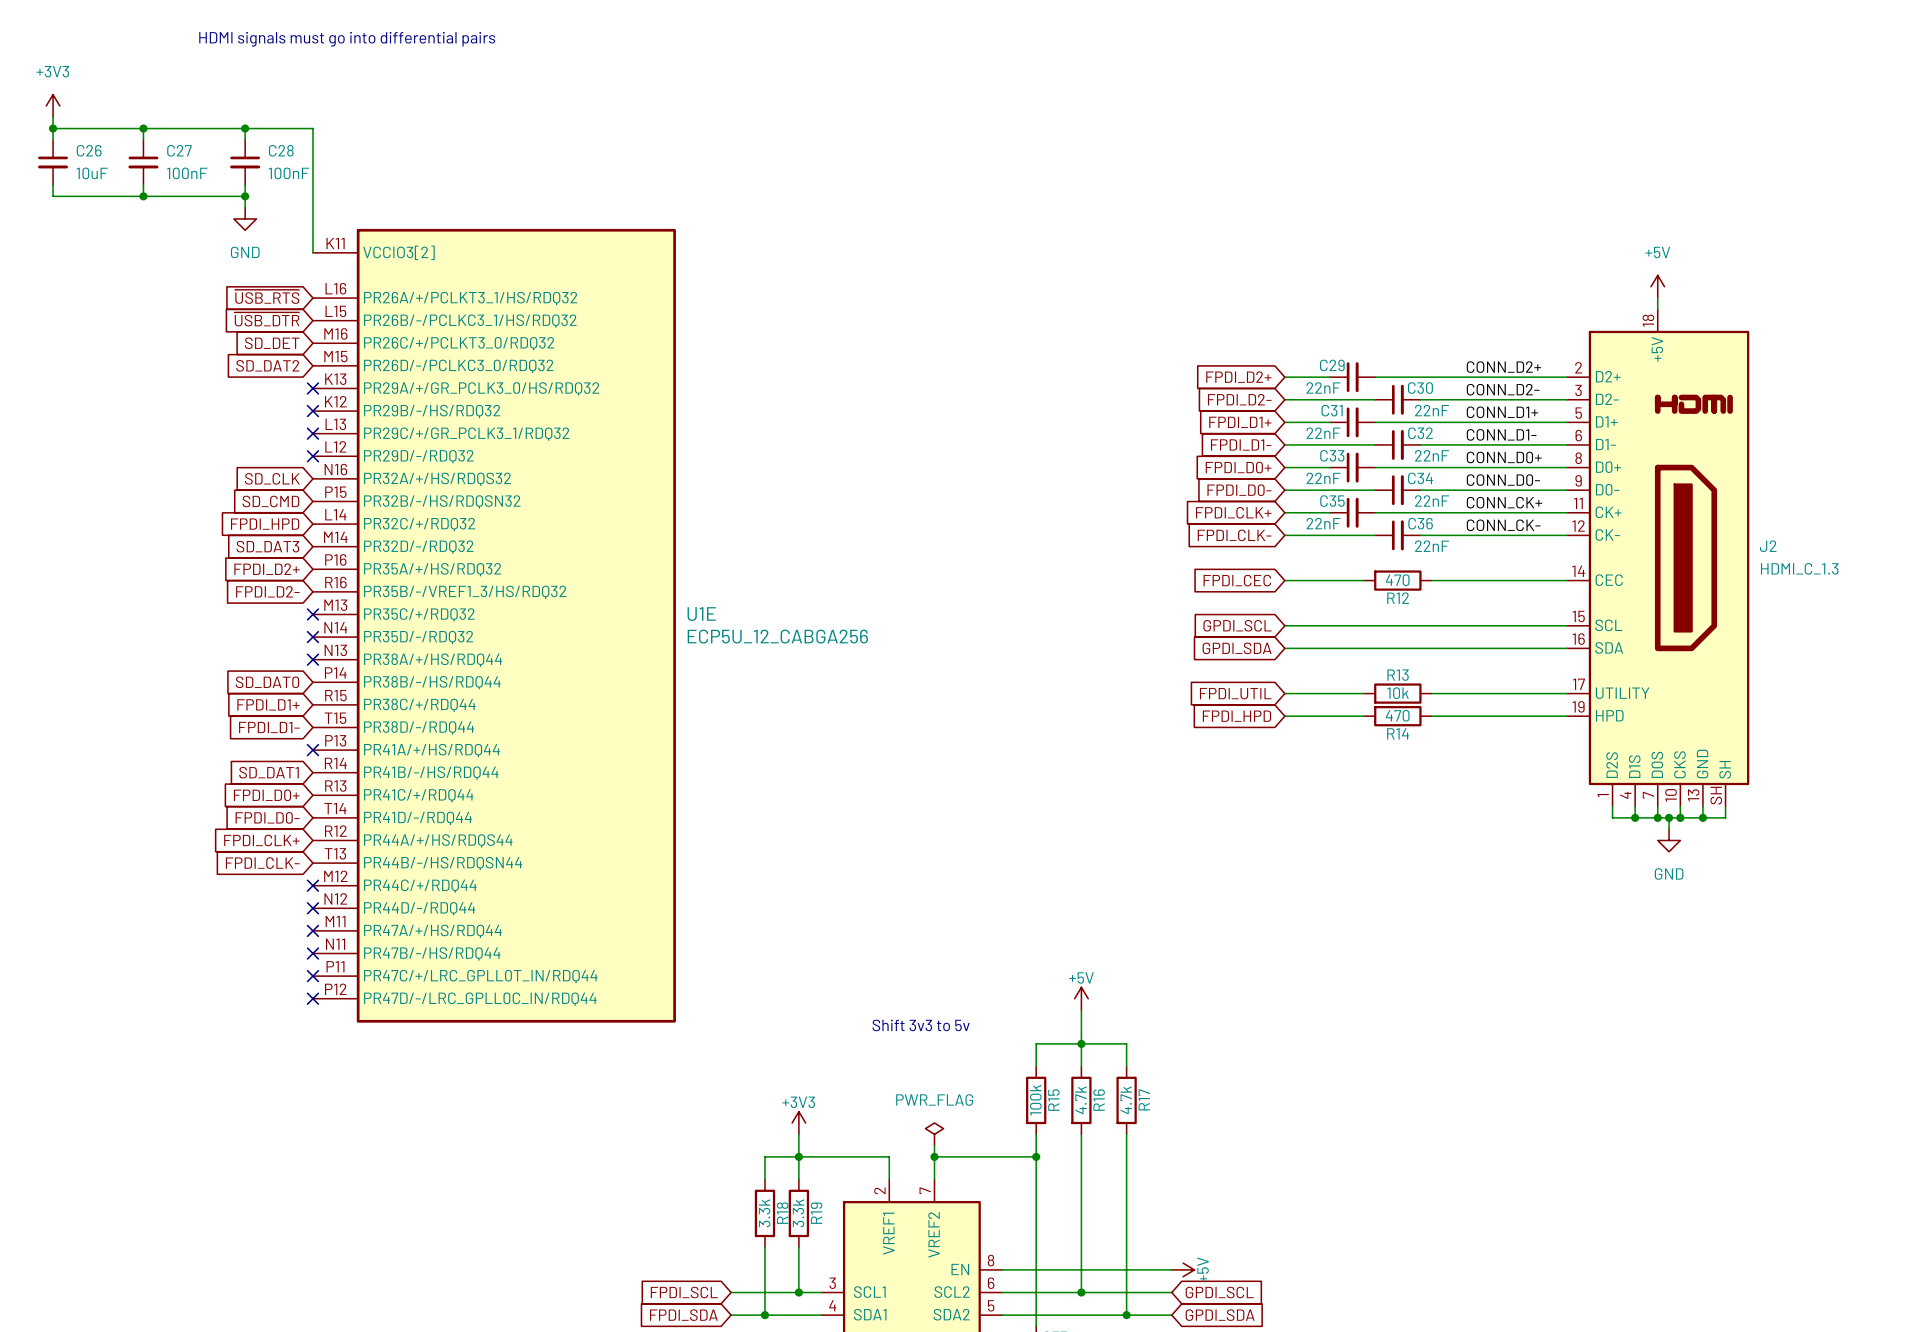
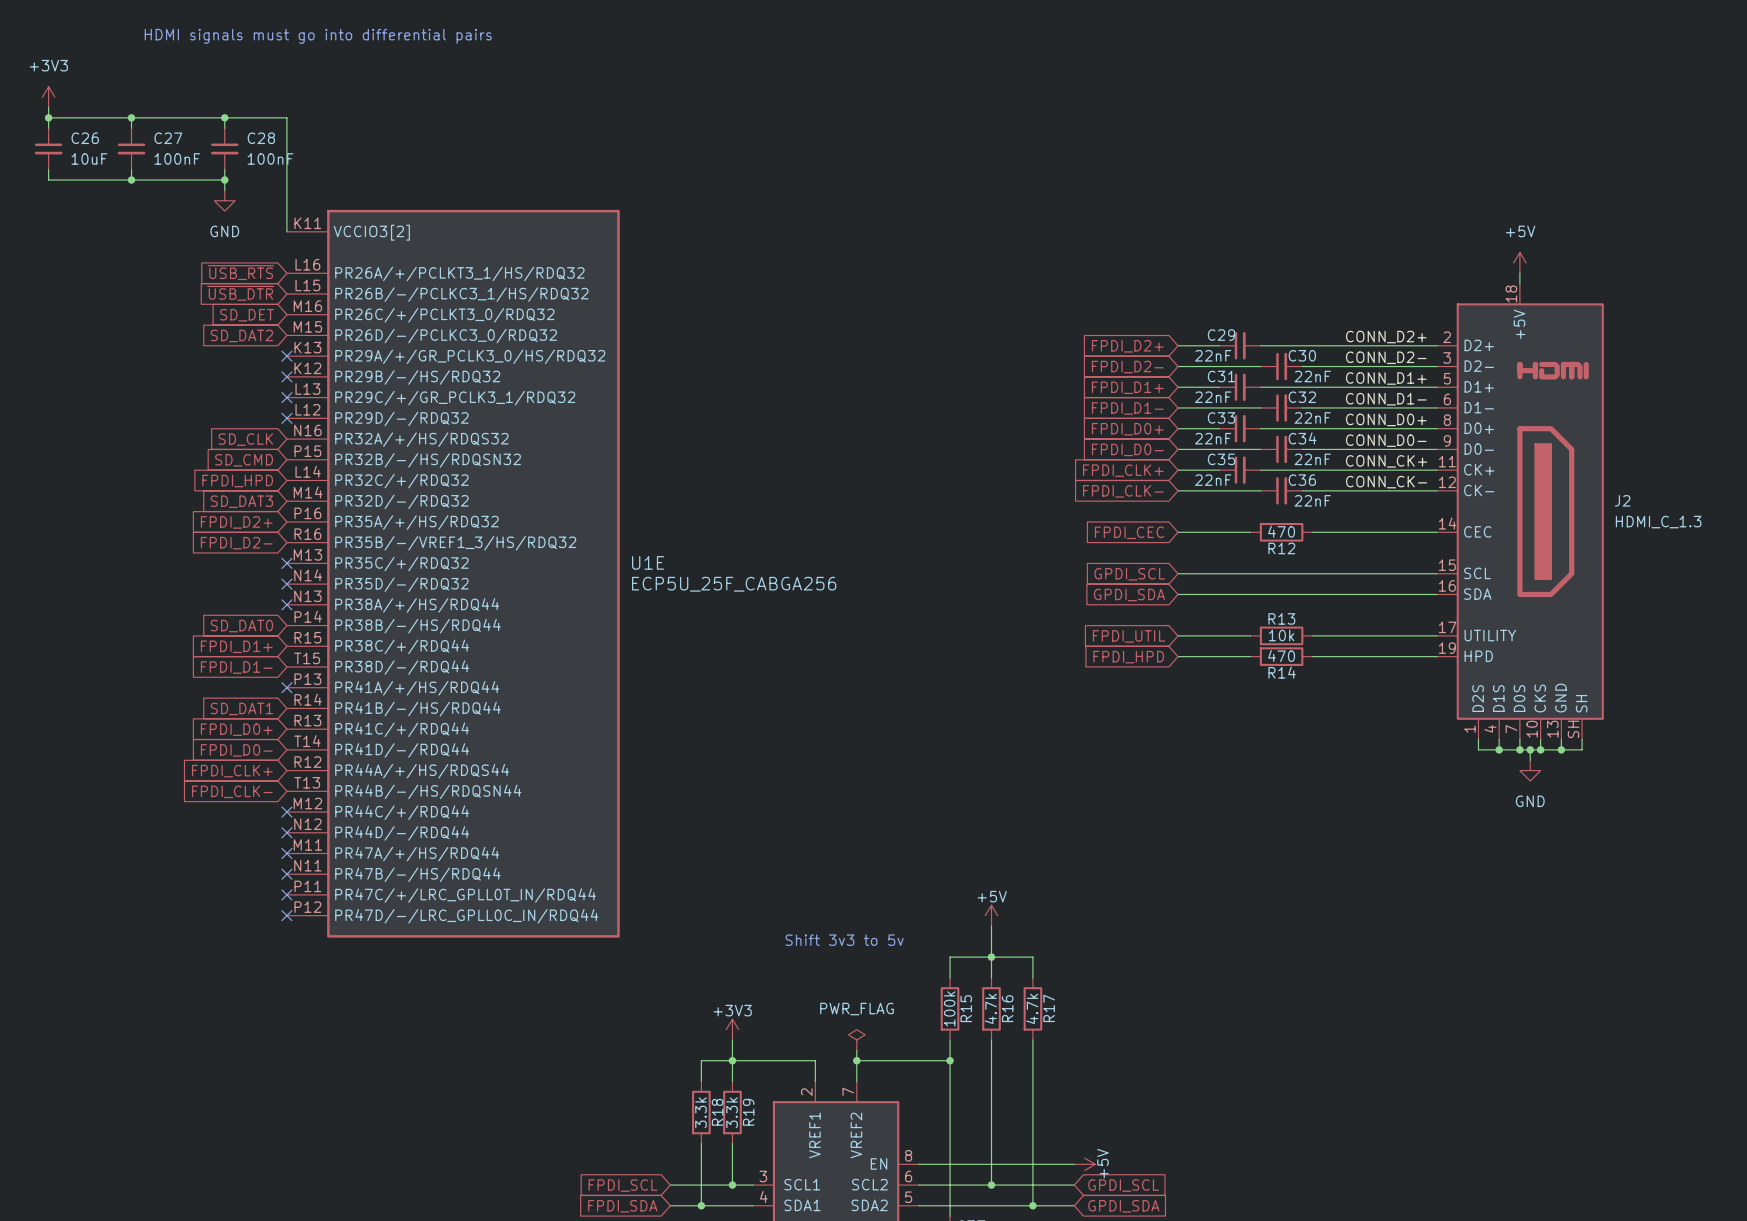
U1E value: ECP5U_12_CABGA256 (777, 636) -> ECP5U_25F_CABGA256 (734, 584)

